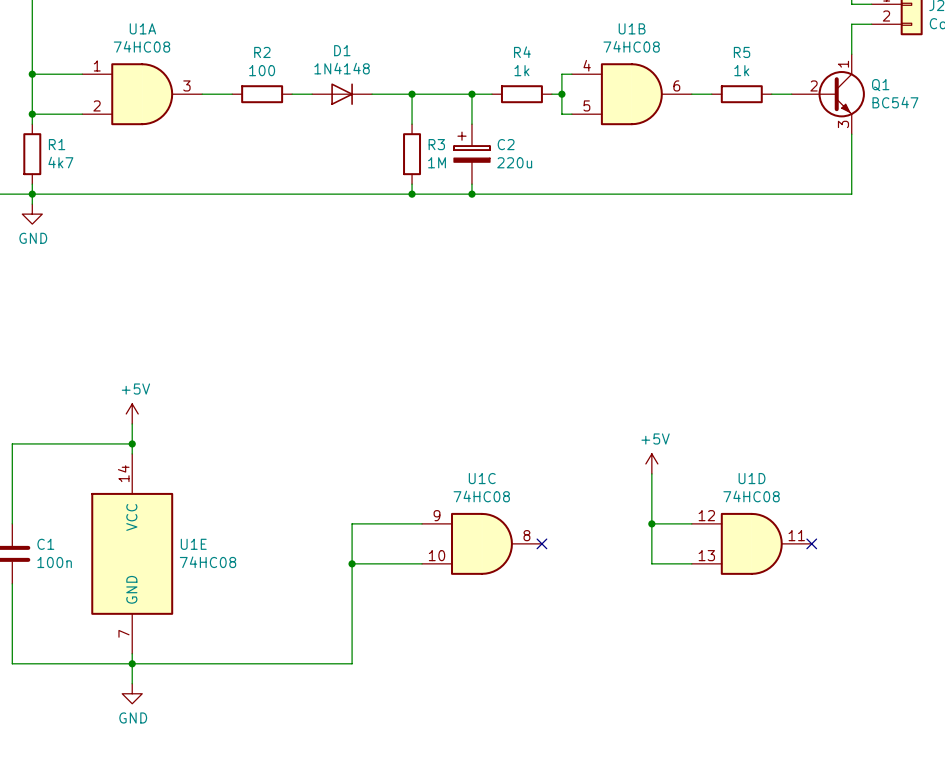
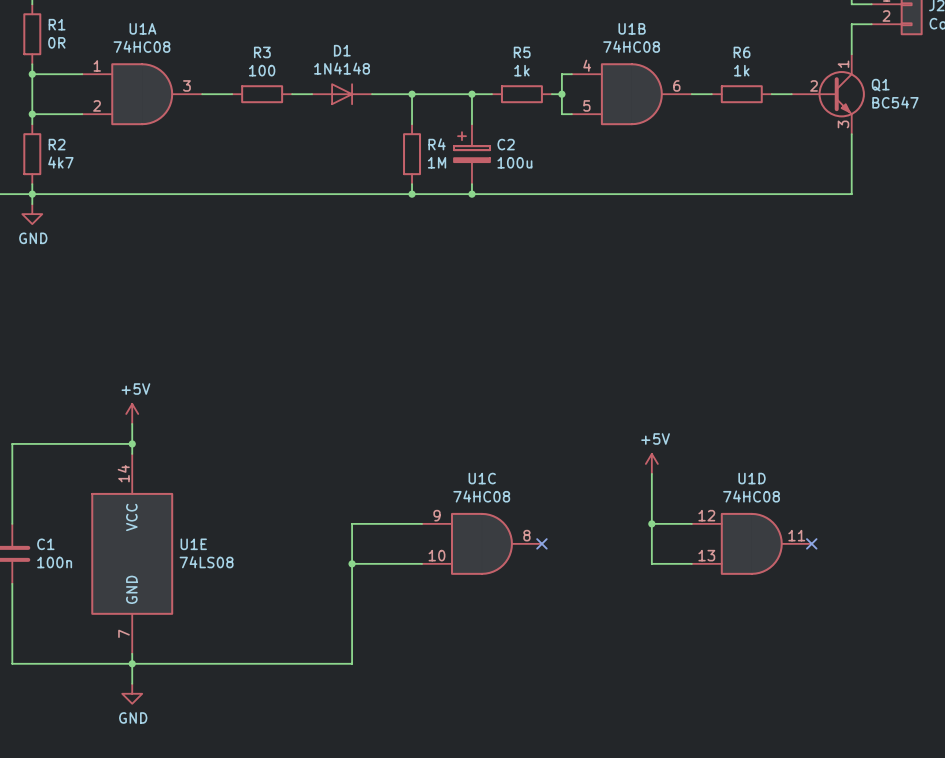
wire: (32, 4) (32, 64) -> none
R1: none -> 0R (32, 34)
R2 name: R2 (262, 52) -> R3 (262, 52)
R4 name: R4 (522, 52) -> R5 (522, 52)
R5 name: R5 (742, 52) -> R6 (742, 52)
R1 name: R1 (57, 144) -> R2 (57, 144)
R3 name: R3 (436, 144) -> R4 (437, 144)
C2 value: 220u (514, 162) -> 100u (514, 162)
U1E value: 74HC08 (208, 562) -> 74LS08 (206, 562)

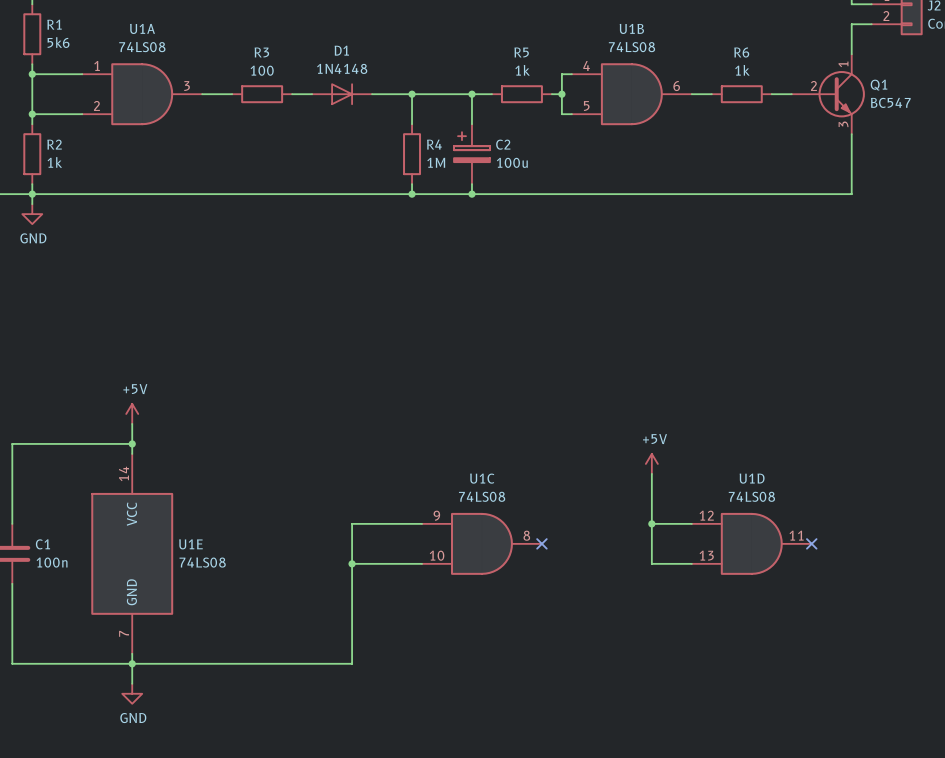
R1 value: 0R (56, 42) -> 5k6 (58, 42)
U1A value: 74HC08 (141, 46) -> 74LS08 (142, 47)
U1B value: 74HC08 (631, 46) -> 74LS08 (631, 47)
R2 value: 4k7 (60, 162) -> 1k (54, 162)
U1C value: 74HC08 (481, 496) -> 74LS08 (482, 496)
U1D value: 74HC08 (751, 496) -> 74LS08 (751, 496)

